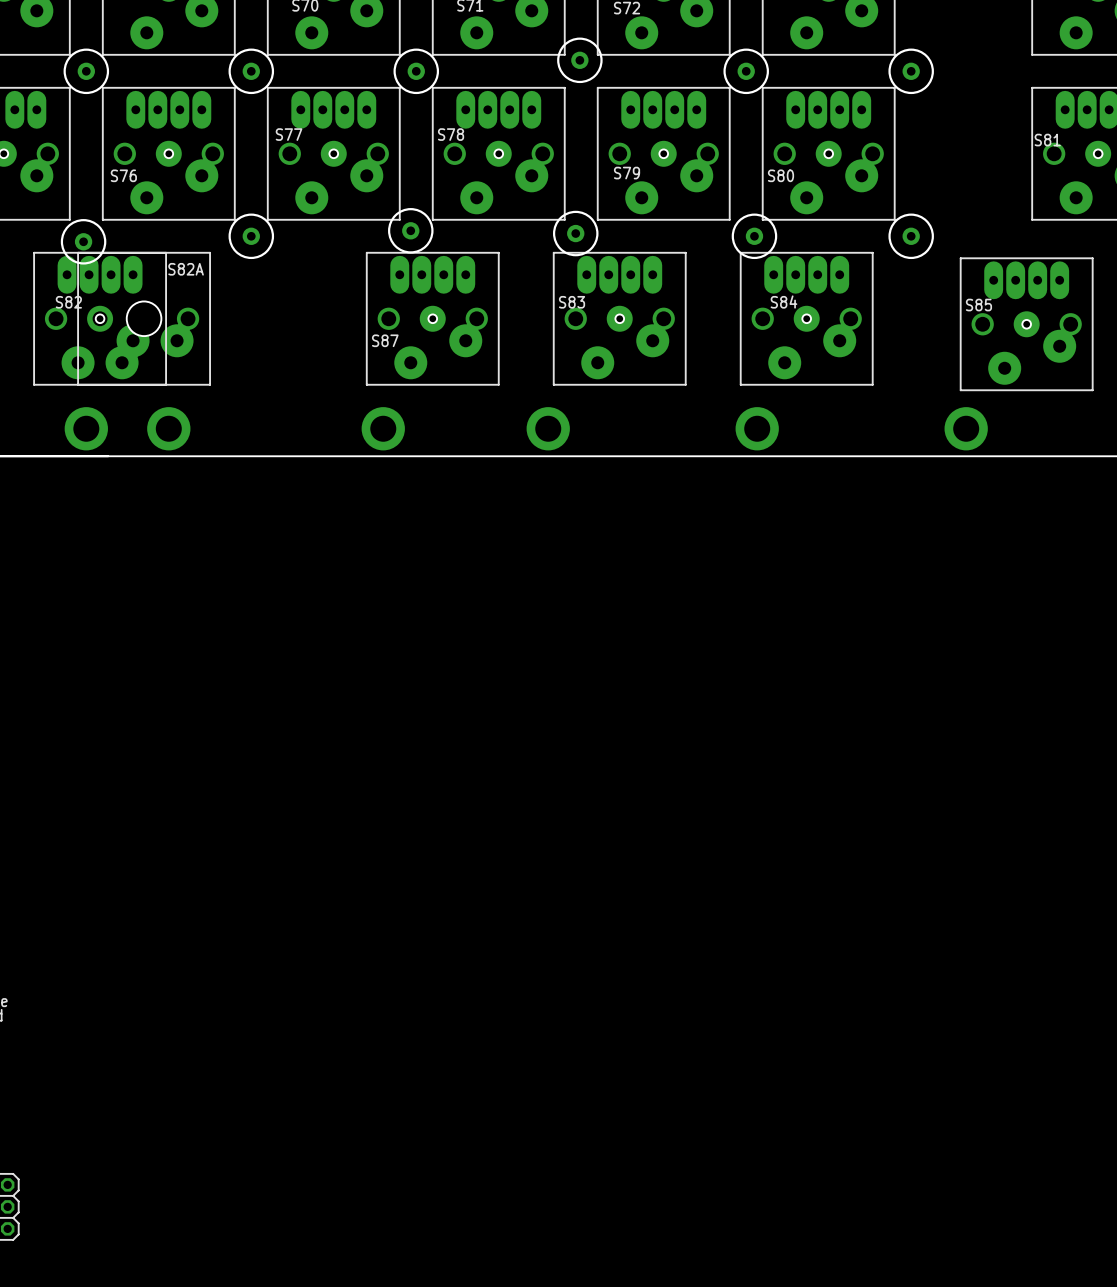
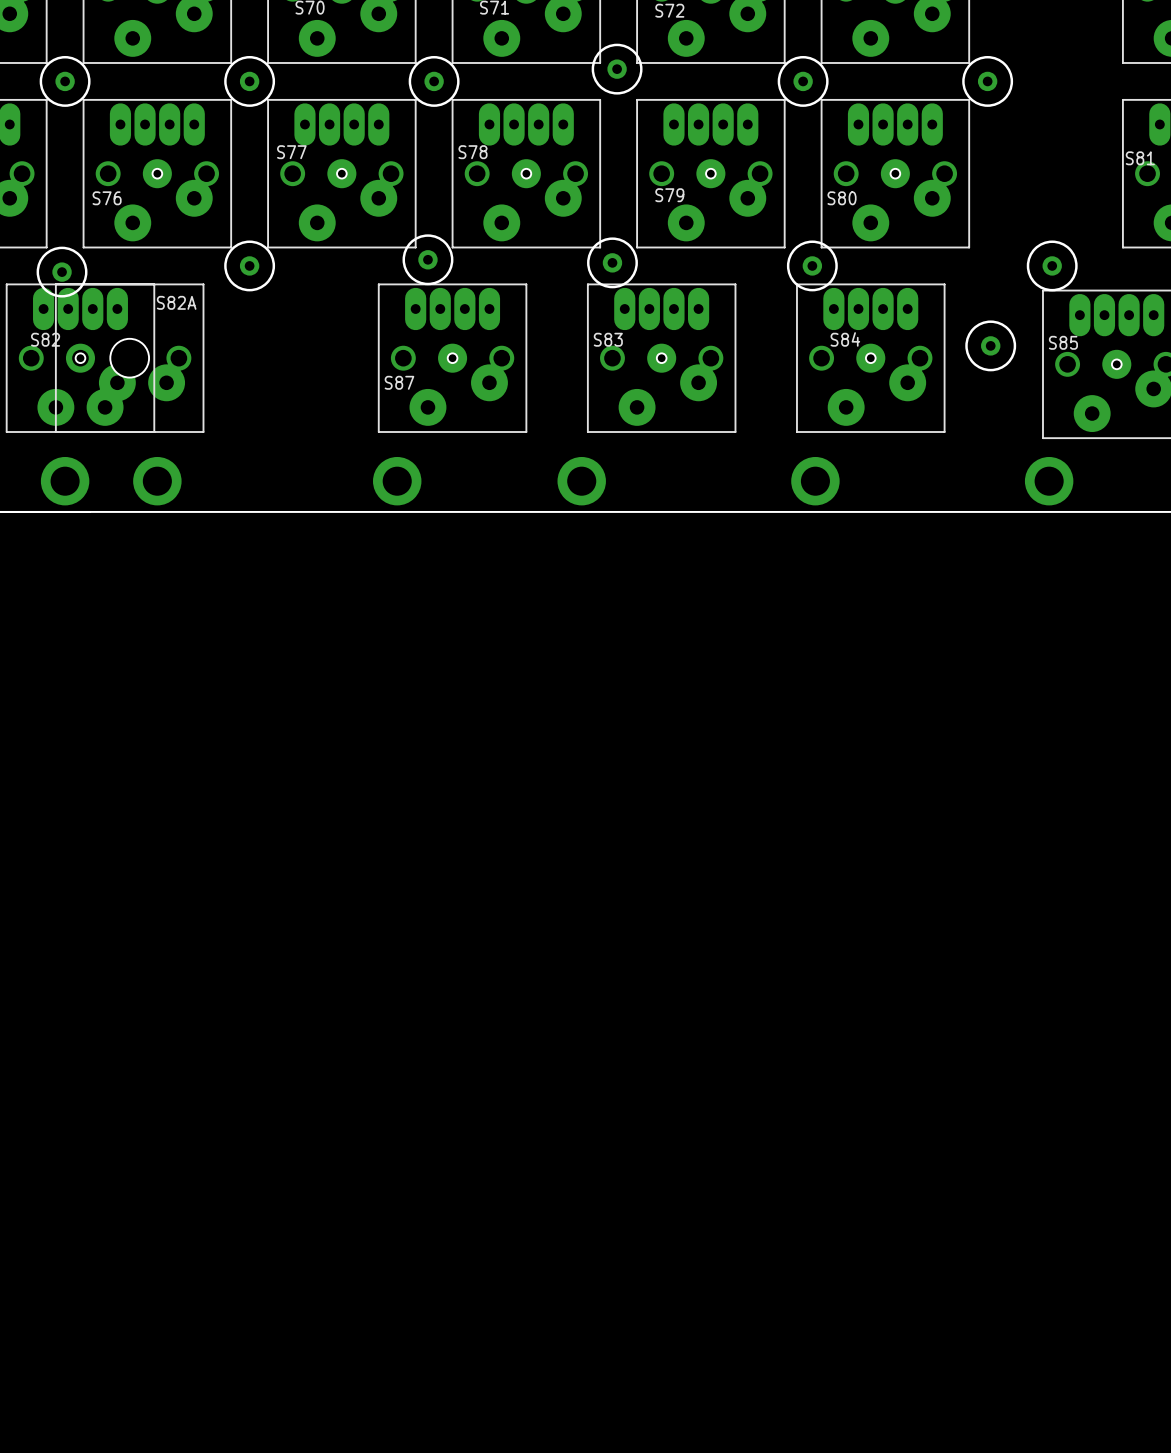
round board edge: [888, 213, 934, 260] -> none
round board edge: none -> [1026, 240, 1078, 292]
via: (911, 236) -> none
via: none -> (1052, 265)
round board edge: none -> [965, 320, 1017, 372]
via: none -> (990, 345)

